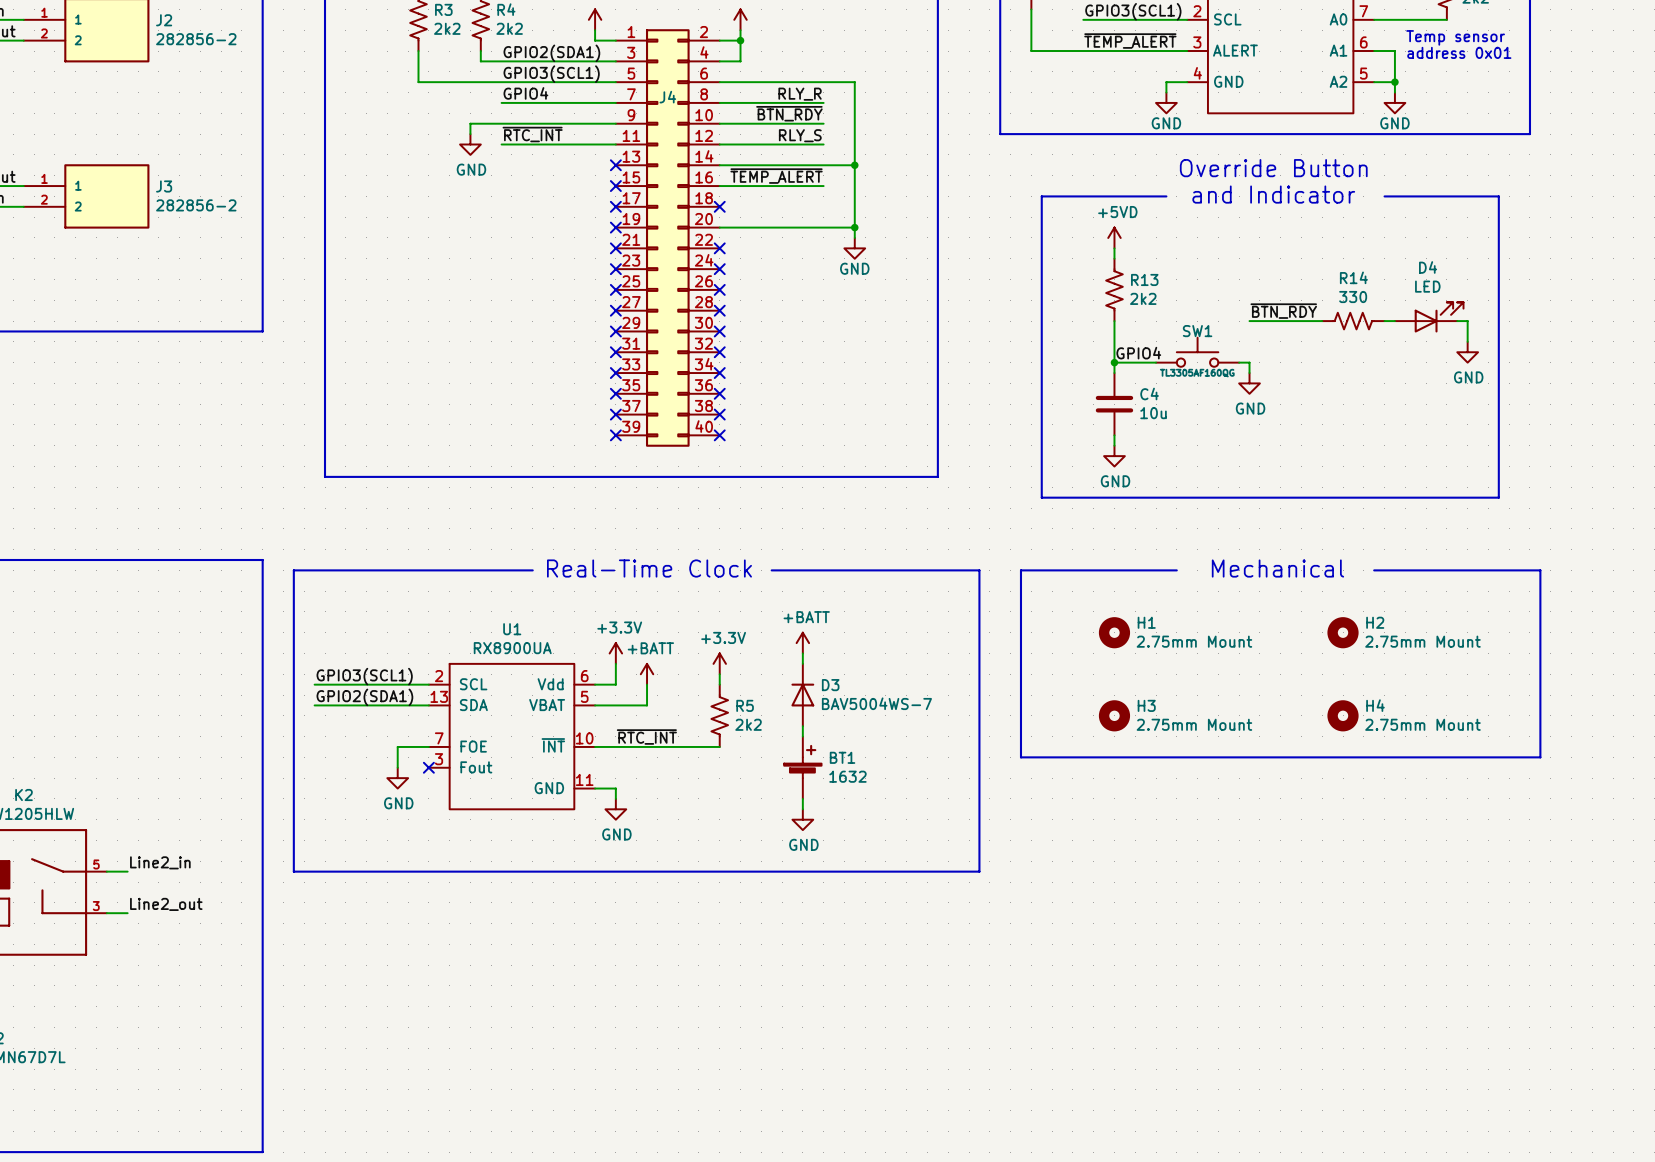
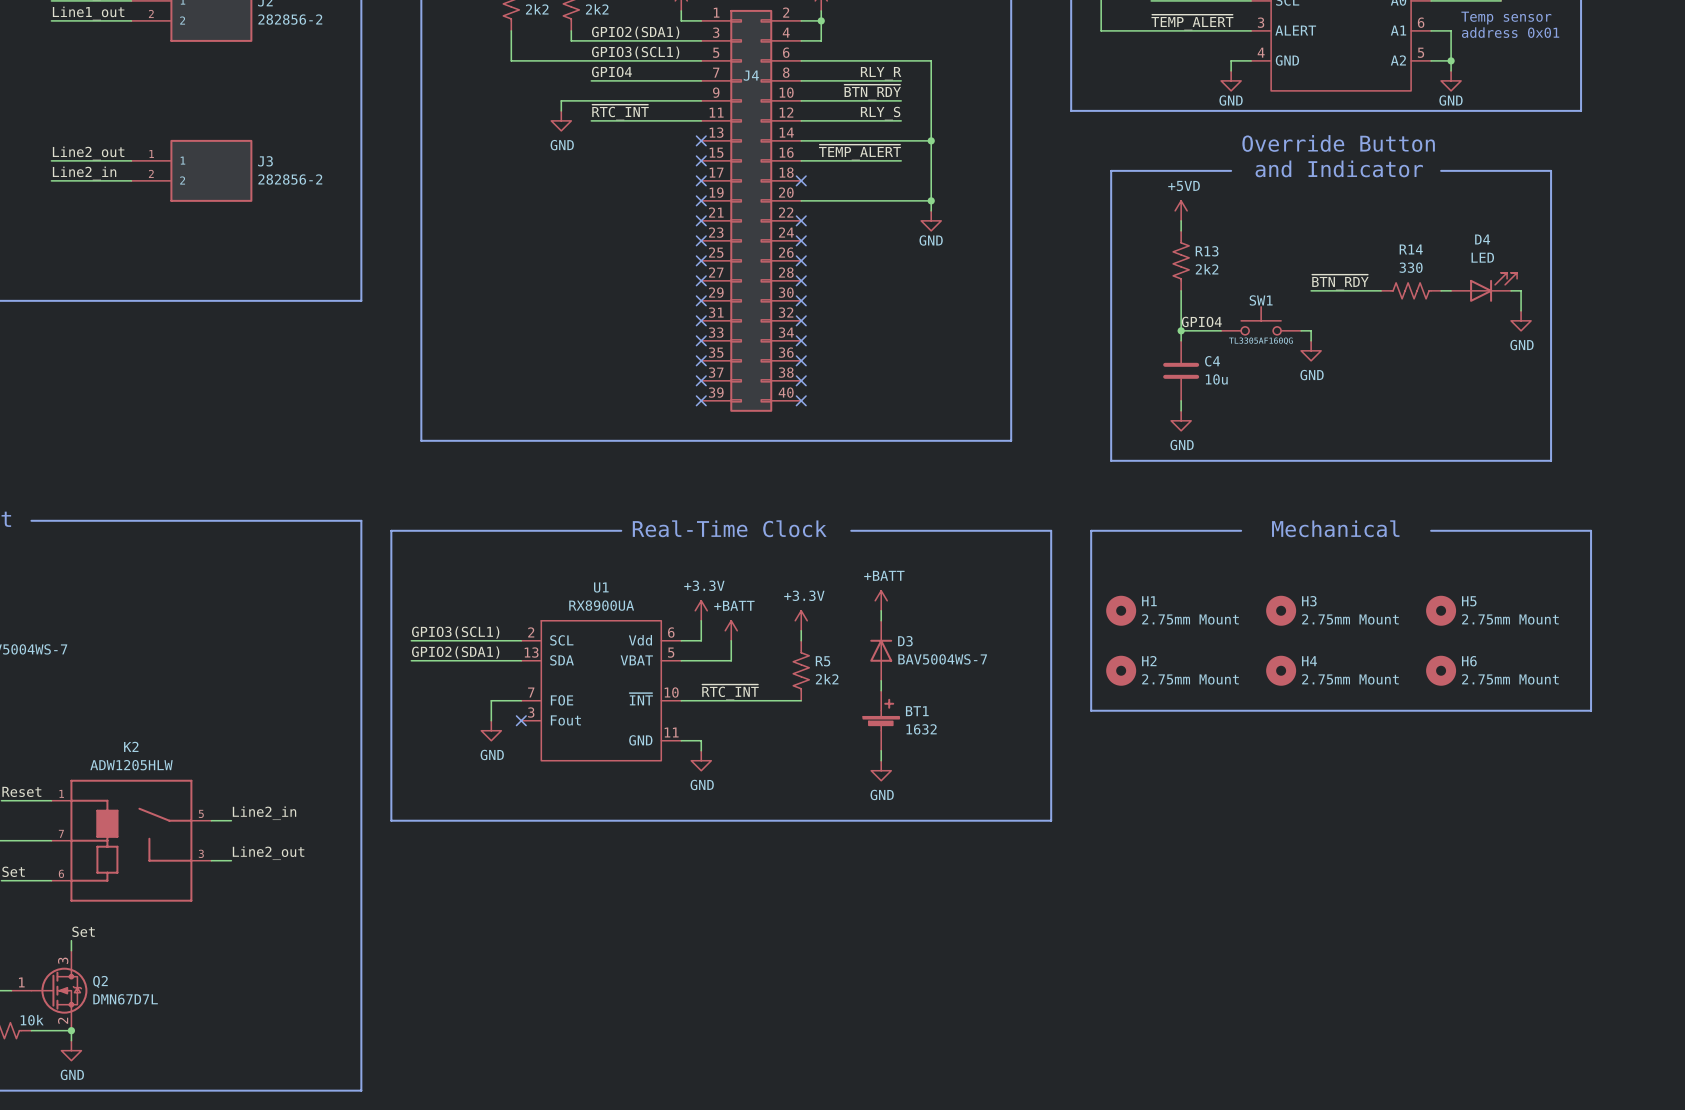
H1 position: (1114, 632) -> (1121, 610)
H2 position: (1343, 632) -> (1121, 670)
H5: none -> 2.75mm Mount (1441, 610)
H3 position: (1114, 715) -> (1281, 610)
H4 position: (1343, 715) -> (1281, 670)
H6: none -> 2.75mm Mount (1441, 670)

